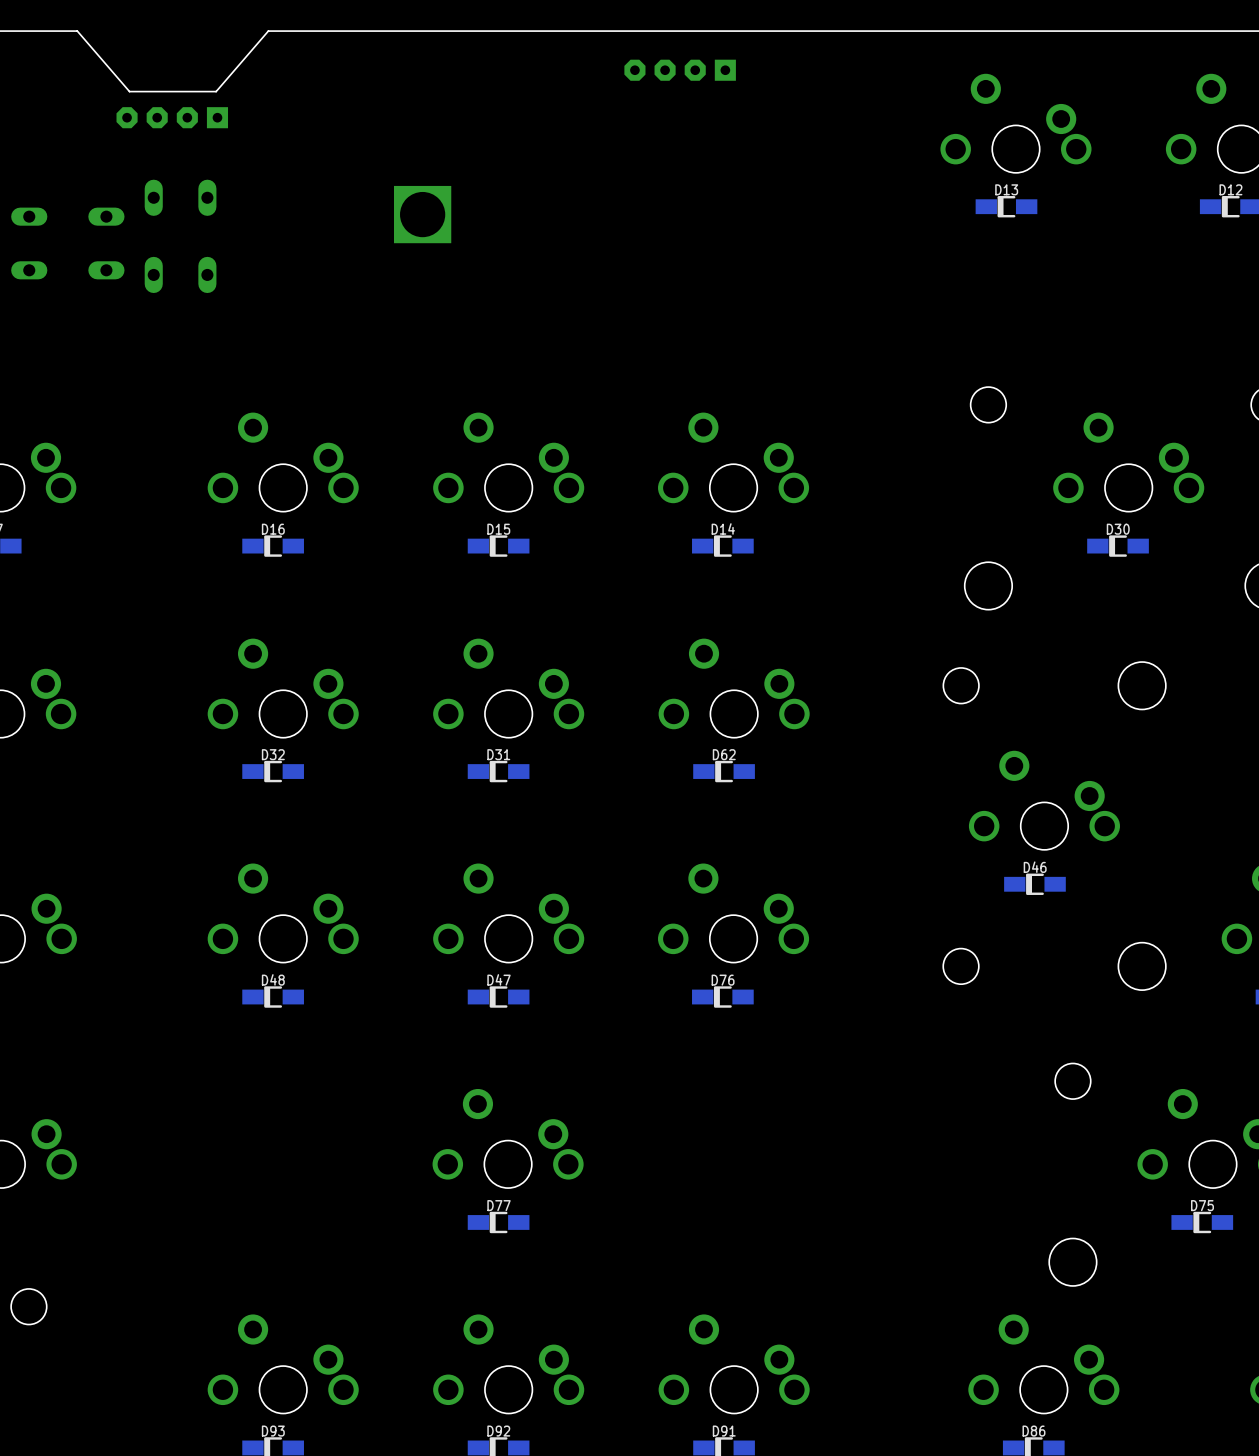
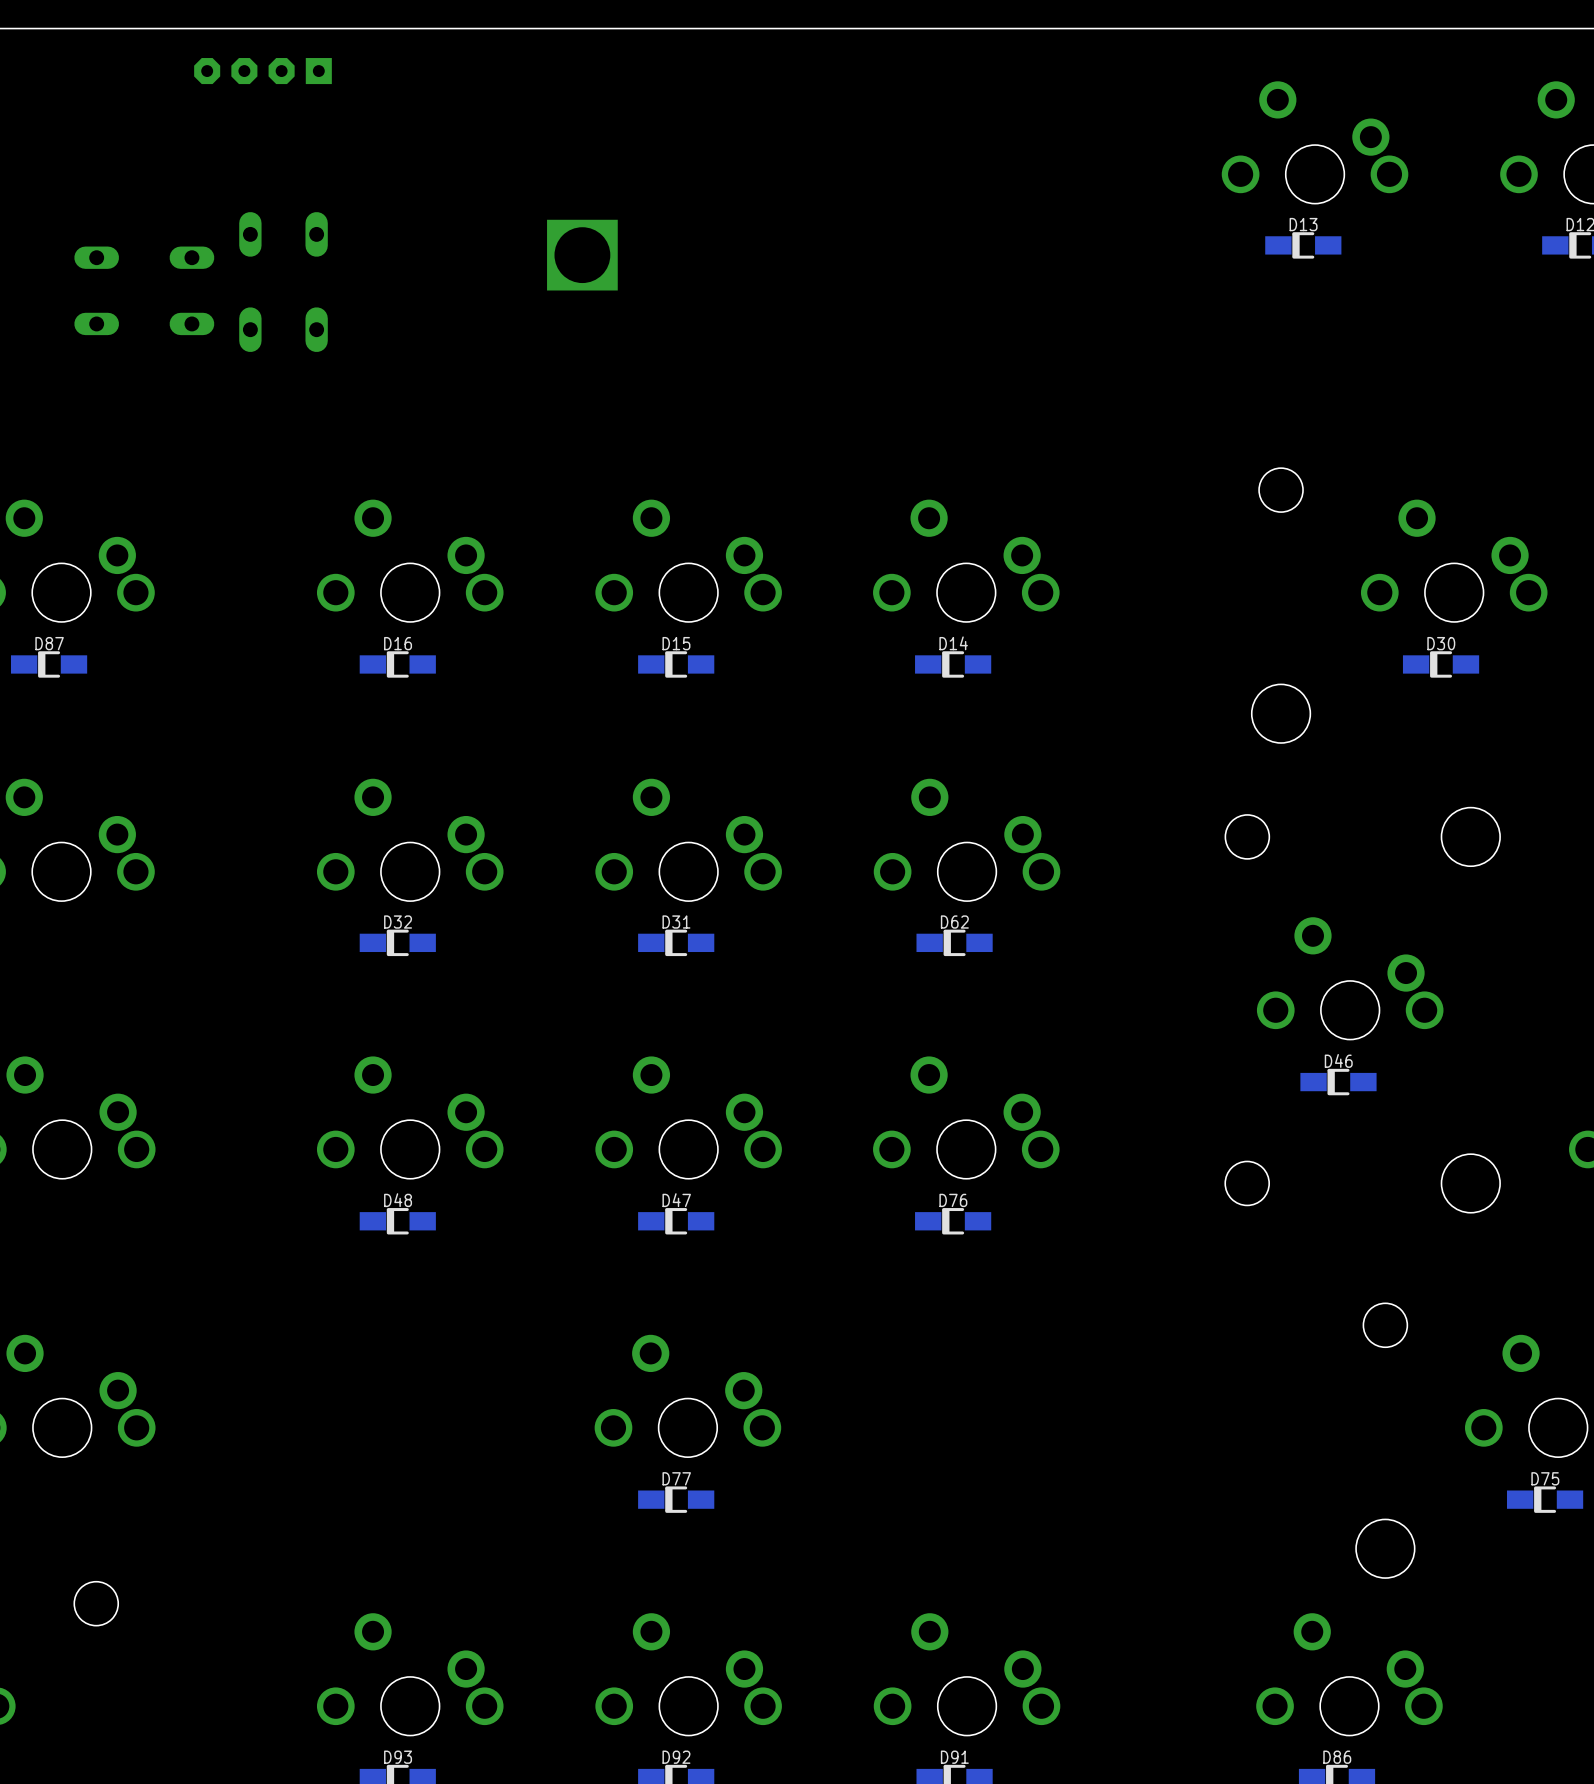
board edge: (268, 31) (216, 91) (129, 91) (77, 31) -> (391, 28) (156, 28)
part: (680, 70) -> none
part position: (172, 117) -> (262, 71)

